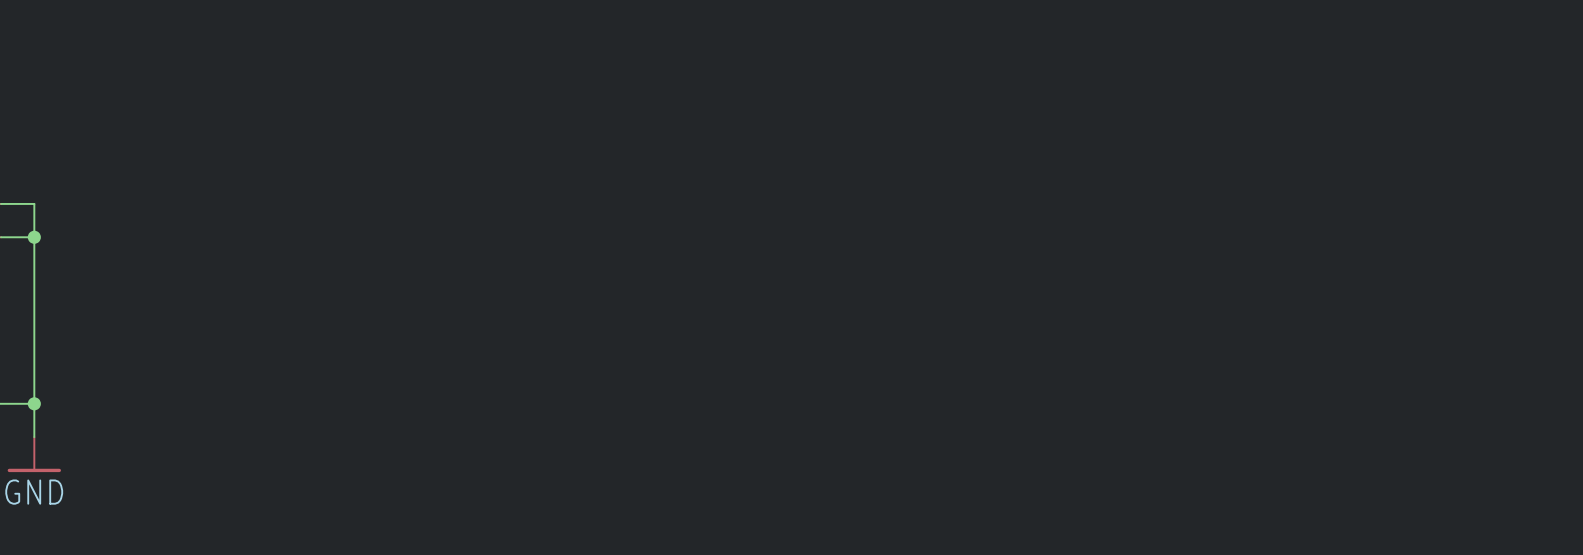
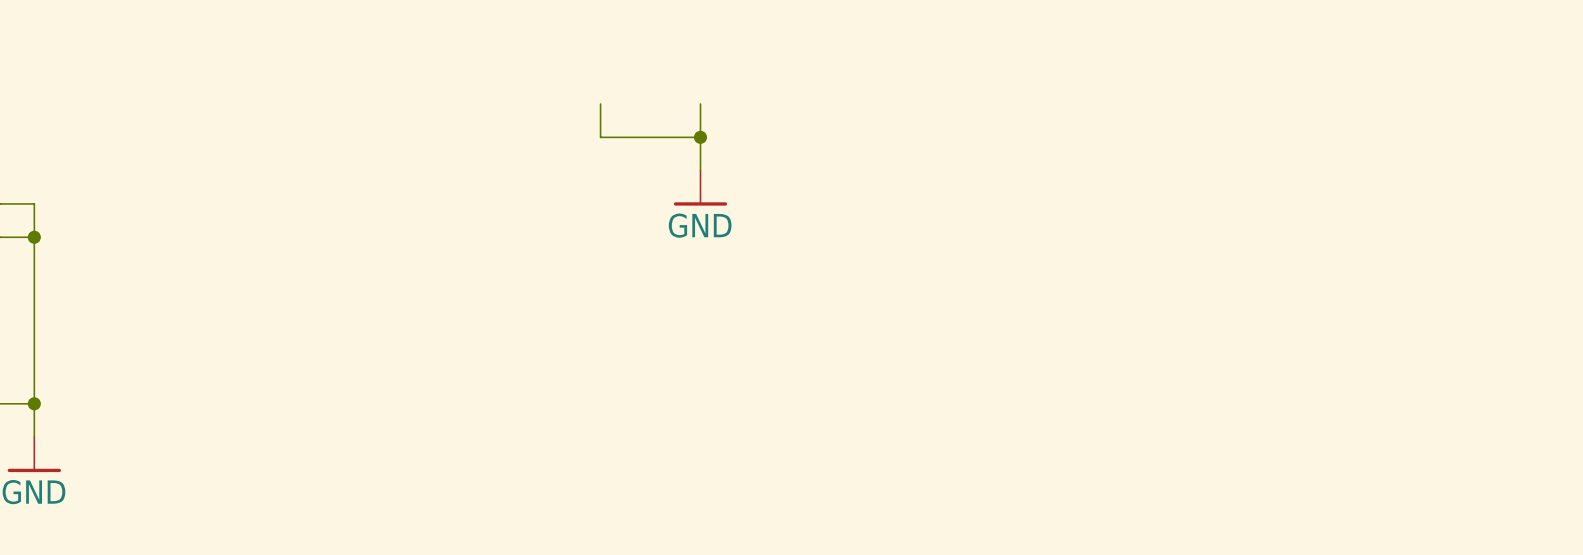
wire: none -> (600, 104) (600, 137) (700, 137)
wire: none -> (700, 104) (700, 170)
junction: none -> (700, 137)
power symbol: none -> GND (700, 188)

